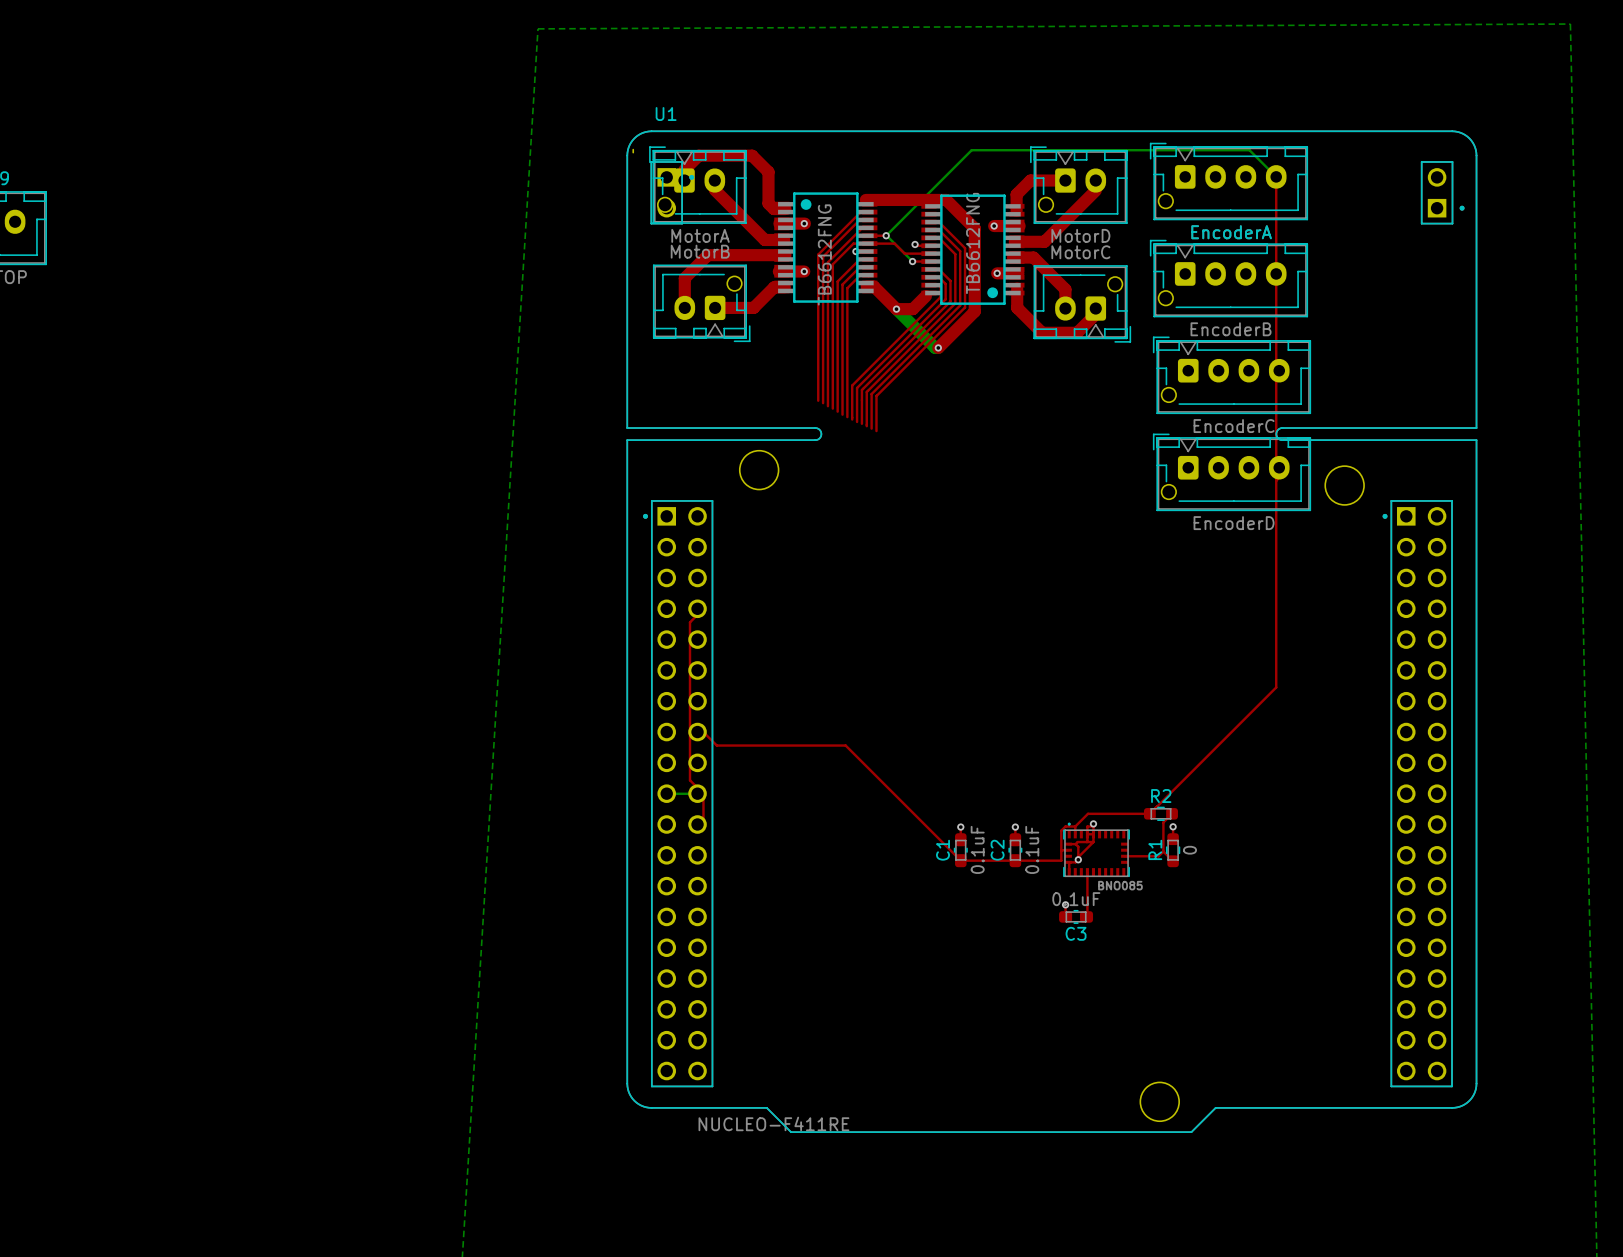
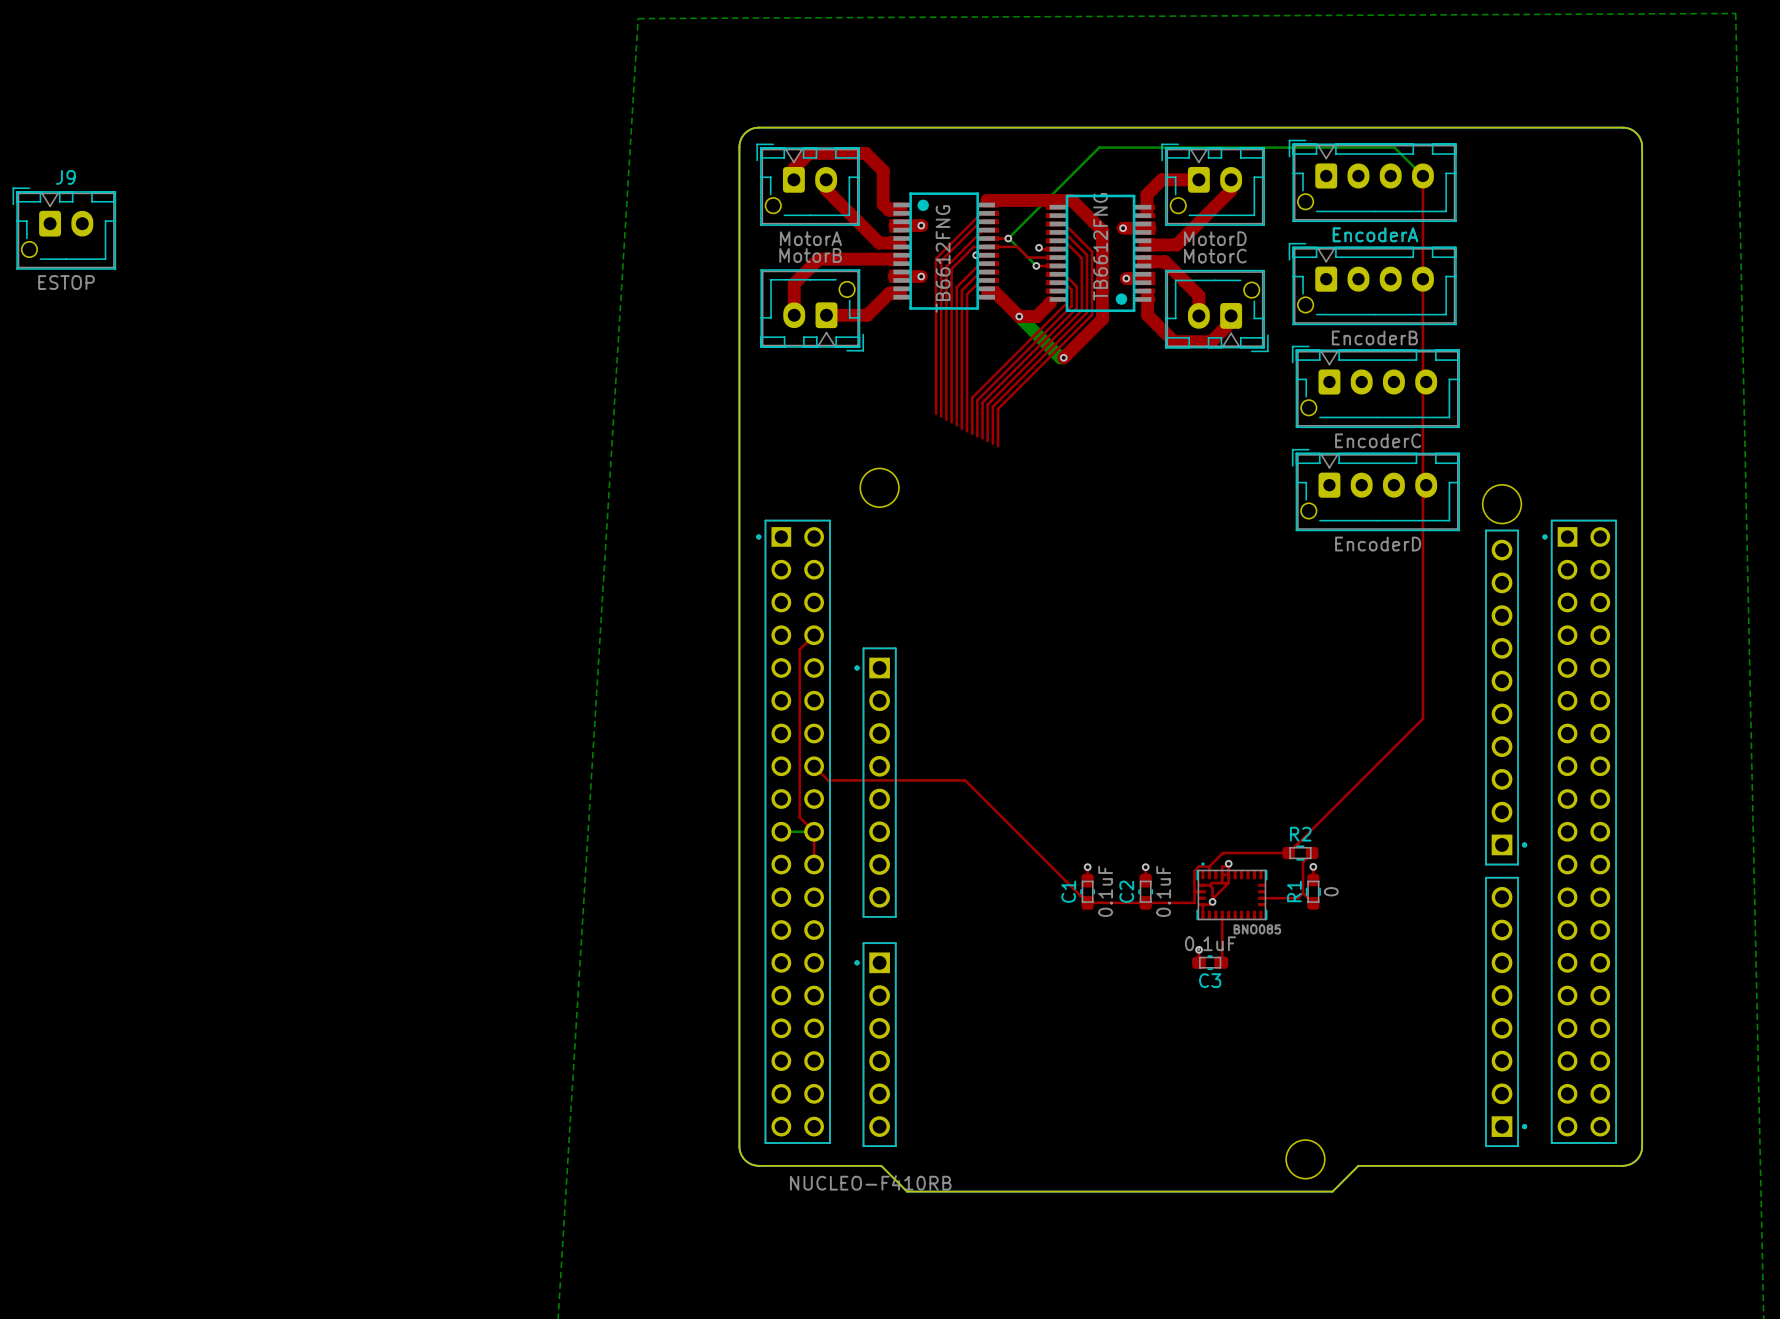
board edge: none -> (739, 146) (745, 133) (758, 127) (1622, 127) (1636, 133) (1642, 146) (1642, 1146) (1636, 1160) (1622, 1165) (1358, 1165) (1332, 1191) (907, 1191) (881, 1165) (758, 1165) (745, 1160) (739, 1146) (739, 150)
U1: NUCLEO-F411RE (1051, 631) -> none
part: none -> NUCLEO-F410RB (1190, 659)

